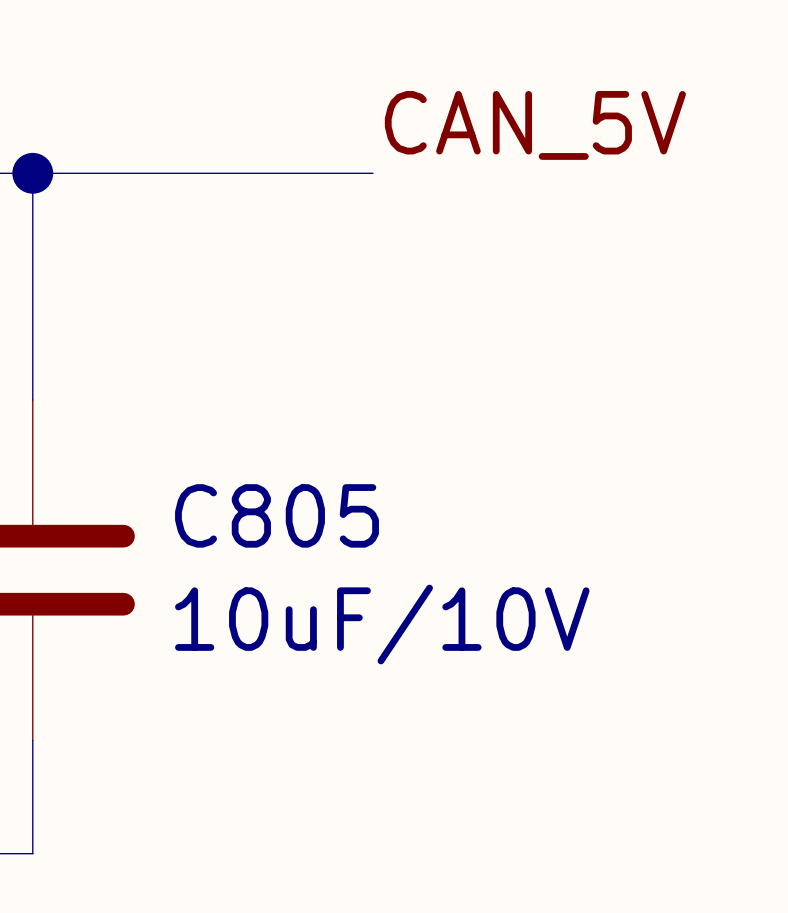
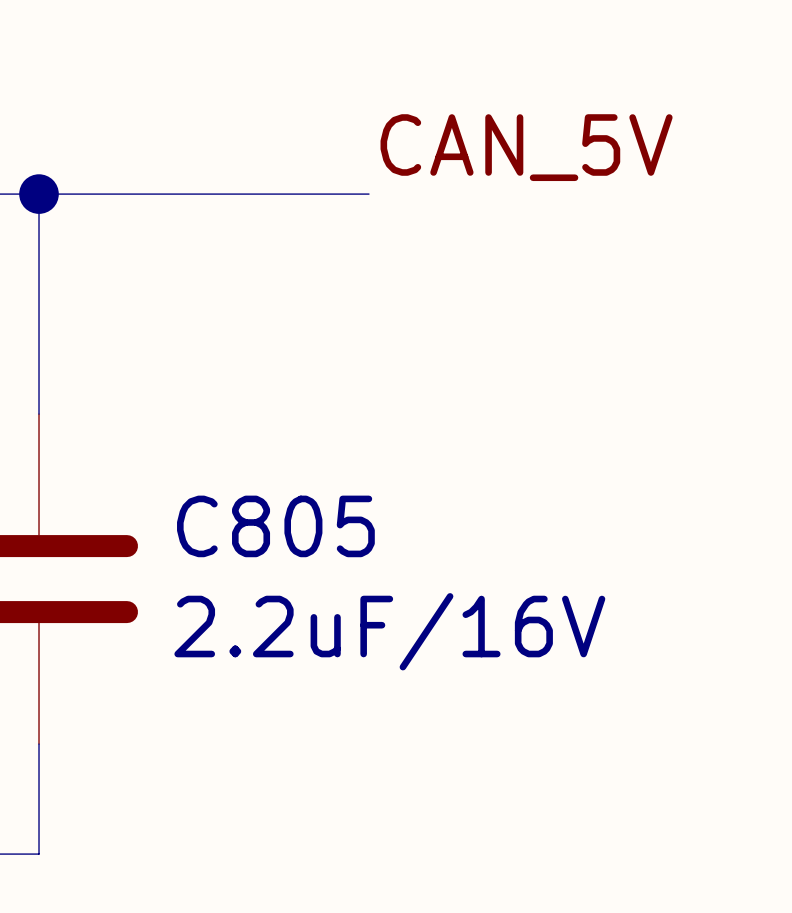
C805 value: 10uF/10V (382, 624) -> 2.2uF/16V (389, 631)

